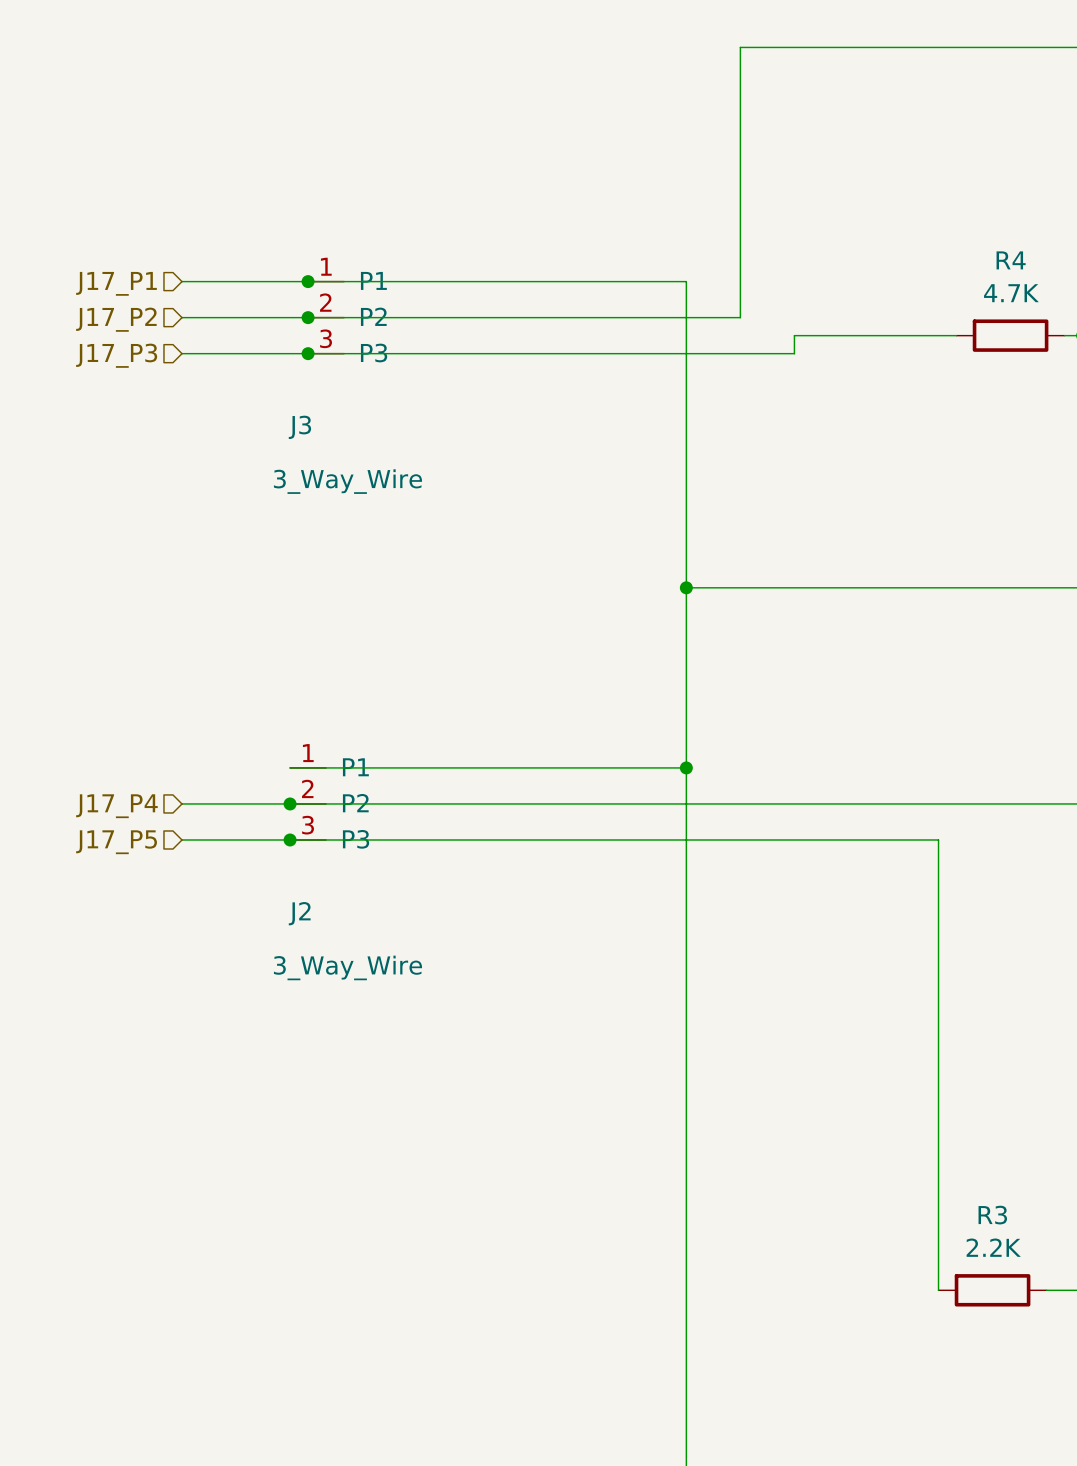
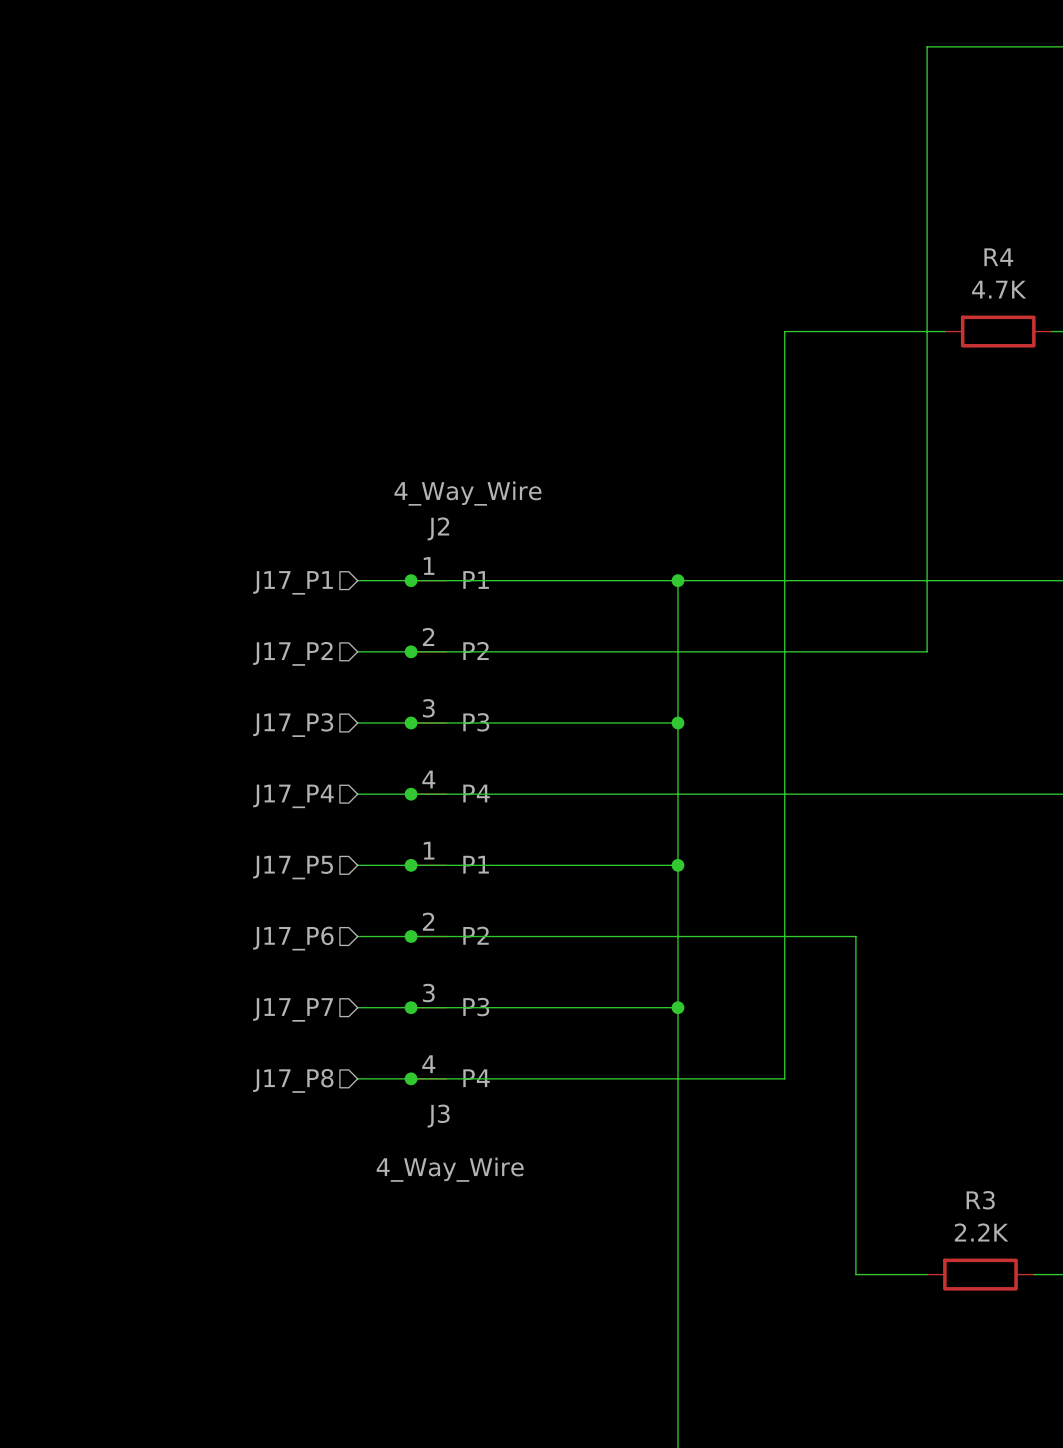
wire: (938, 47) (740, 47) (740, 317) (181, 317) -> (927, 46) (927, 651) (357, 651)
wire: (181, 281) (686, 281) (686, 587) -> (357, 580) (677, 580)
J3 symbol: [308, 281, 345, 354] -> [411, 865, 447, 1079]
junction: (308, 281) -> none
hierarchical label: J17_P1 (116, 283) -> none
junction: (308, 317) -> none
hierarchical label: J17_P2 (116, 319) -> none
wire: (181, 353) (794, 353) -> (357, 1078) (784, 1078) (784, 349)
junction: (308, 353) -> none
hierarchical label: J17_P3 (116, 355) -> none
J3 name position: J3 (299, 427) -> J3 (438, 1116)
J3 value: 3_Way_Wire (347, 481) -> 4_Way_Wire (450, 1169)
junction: none -> (411, 580)
hierarchical label: none -> J17_P1 (293, 582)
junction: none -> (411, 651)
hierarchical label: none -> J17_P2 (292, 653)
wire: none -> (357, 723) (677, 723)
junction: none -> (411, 723)
hierarchical label: none -> J17_P3 (293, 725)
wire: (290, 767) (686, 767) -> none
J2 symbol: [290, 767, 327, 840] -> [411, 580, 447, 795]
junction position: (686, 767) -> (677, 723)
wire: (181, 803) (362, 803) -> none
junction: (290, 803) -> none
junction: none -> (411, 794)
hierarchical label position: J17_P4 (116, 806) -> J17_P4 (293, 796)
wire: (181, 839) (938, 839) (938, 1290) -> (357, 936) (855, 936) (855, 1274) (927, 1274)
junction: (290, 839) -> none
hierarchical label position: J17_P5 (116, 842) -> J17_P5 (293, 867)
wire: none -> (357, 865) (677, 865)
junction: none -> (411, 865)
junction: none -> (677, 865)
J2 name position: J2 (299, 913) -> J2 (438, 528)
junction: none -> (411, 936)
hierarchical label: none -> J17_P6 (293, 938)
J2 value: 3_Way_Wire (347, 967) -> 4_Way_Wire (467, 493)
wire: none -> (357, 1007) (677, 1007)
junction: none -> (411, 1007)
junction: none -> (677, 1007)
hierarchical label: none -> J17_P7 (293, 1009)
junction: none -> (411, 1078)
hierarchical label: none -> J17_P8 (293, 1080)

